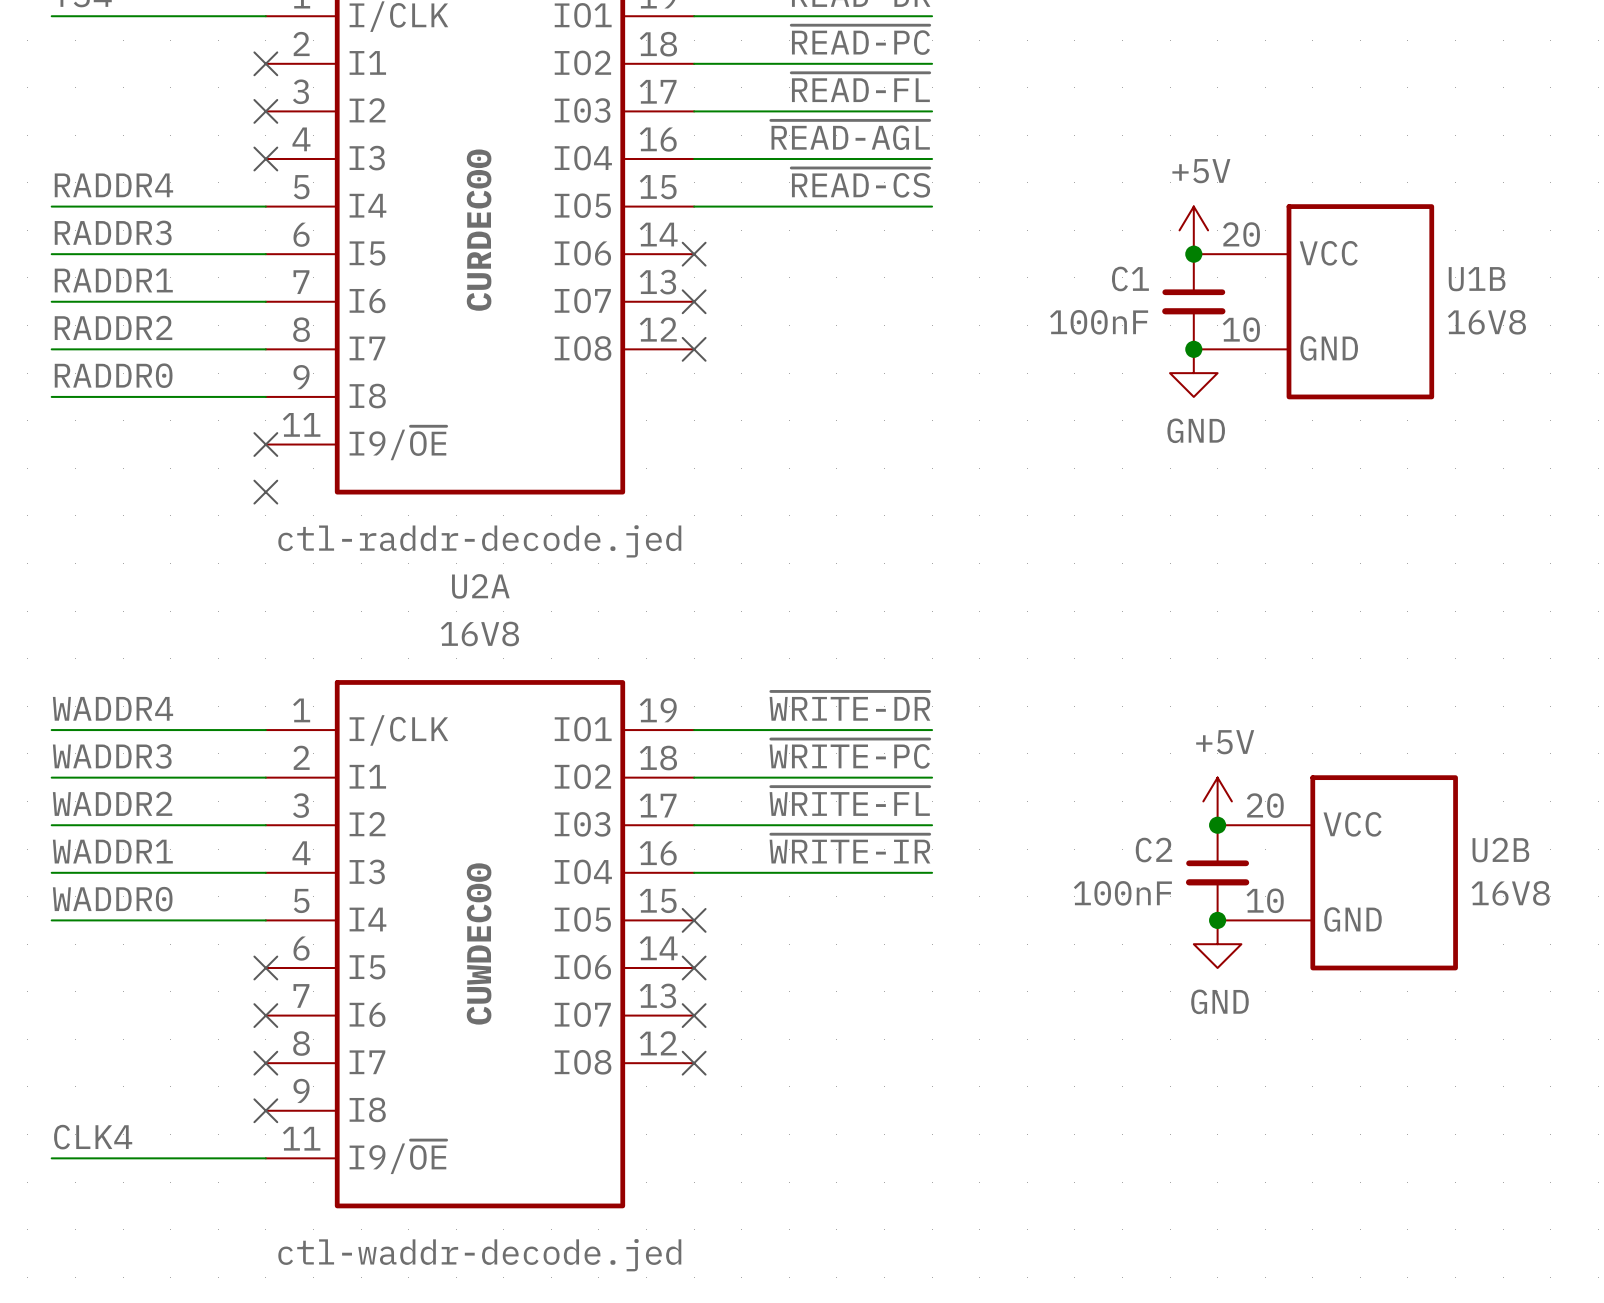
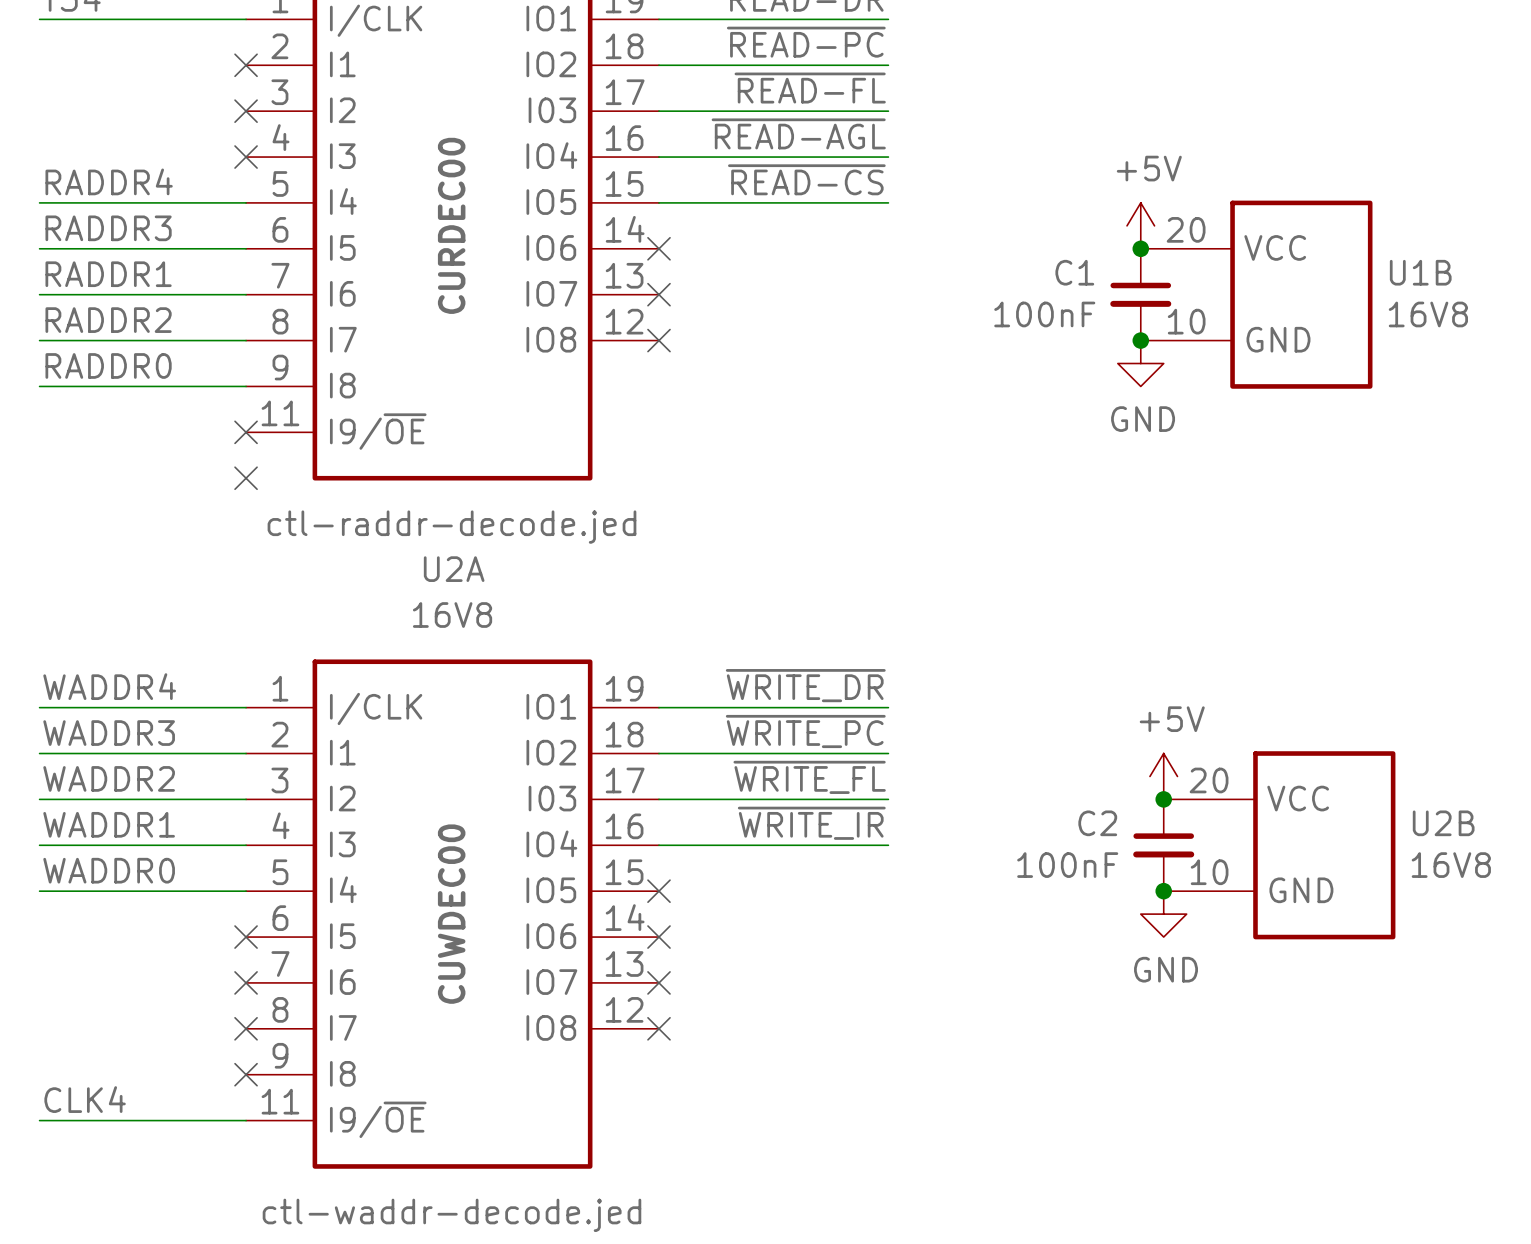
label: ~{WRITE-DR} (849, 706) -> ~{WRITE_DR} (805, 685)
label: ~{WRITE-PC} (849, 753) -> ~{WRITE_PC} (805, 731)
label: ~{WRITE-FL} (849, 801) -> ~{WRITE_FL} (809, 777)
label: ~{WRITE-IR} (849, 848) -> ~{WRITE_IR} (811, 823)

